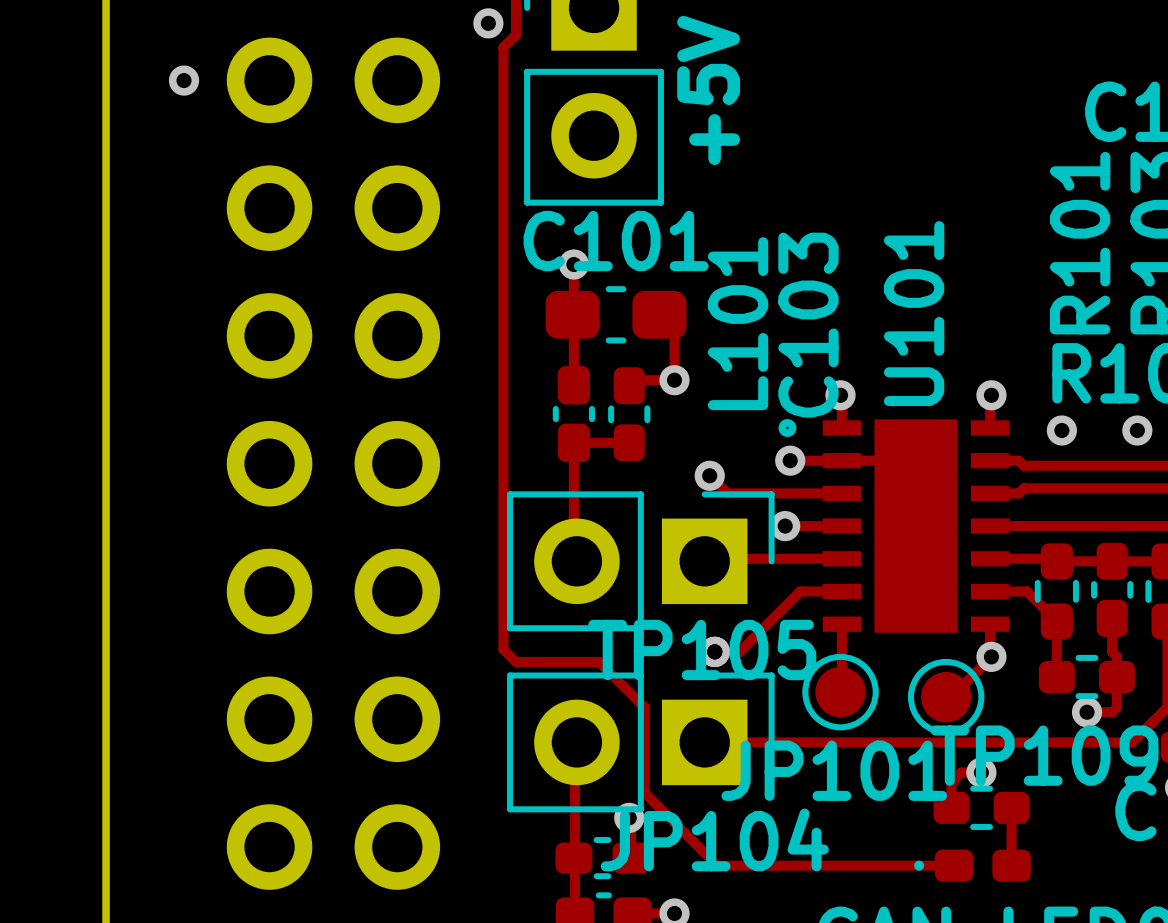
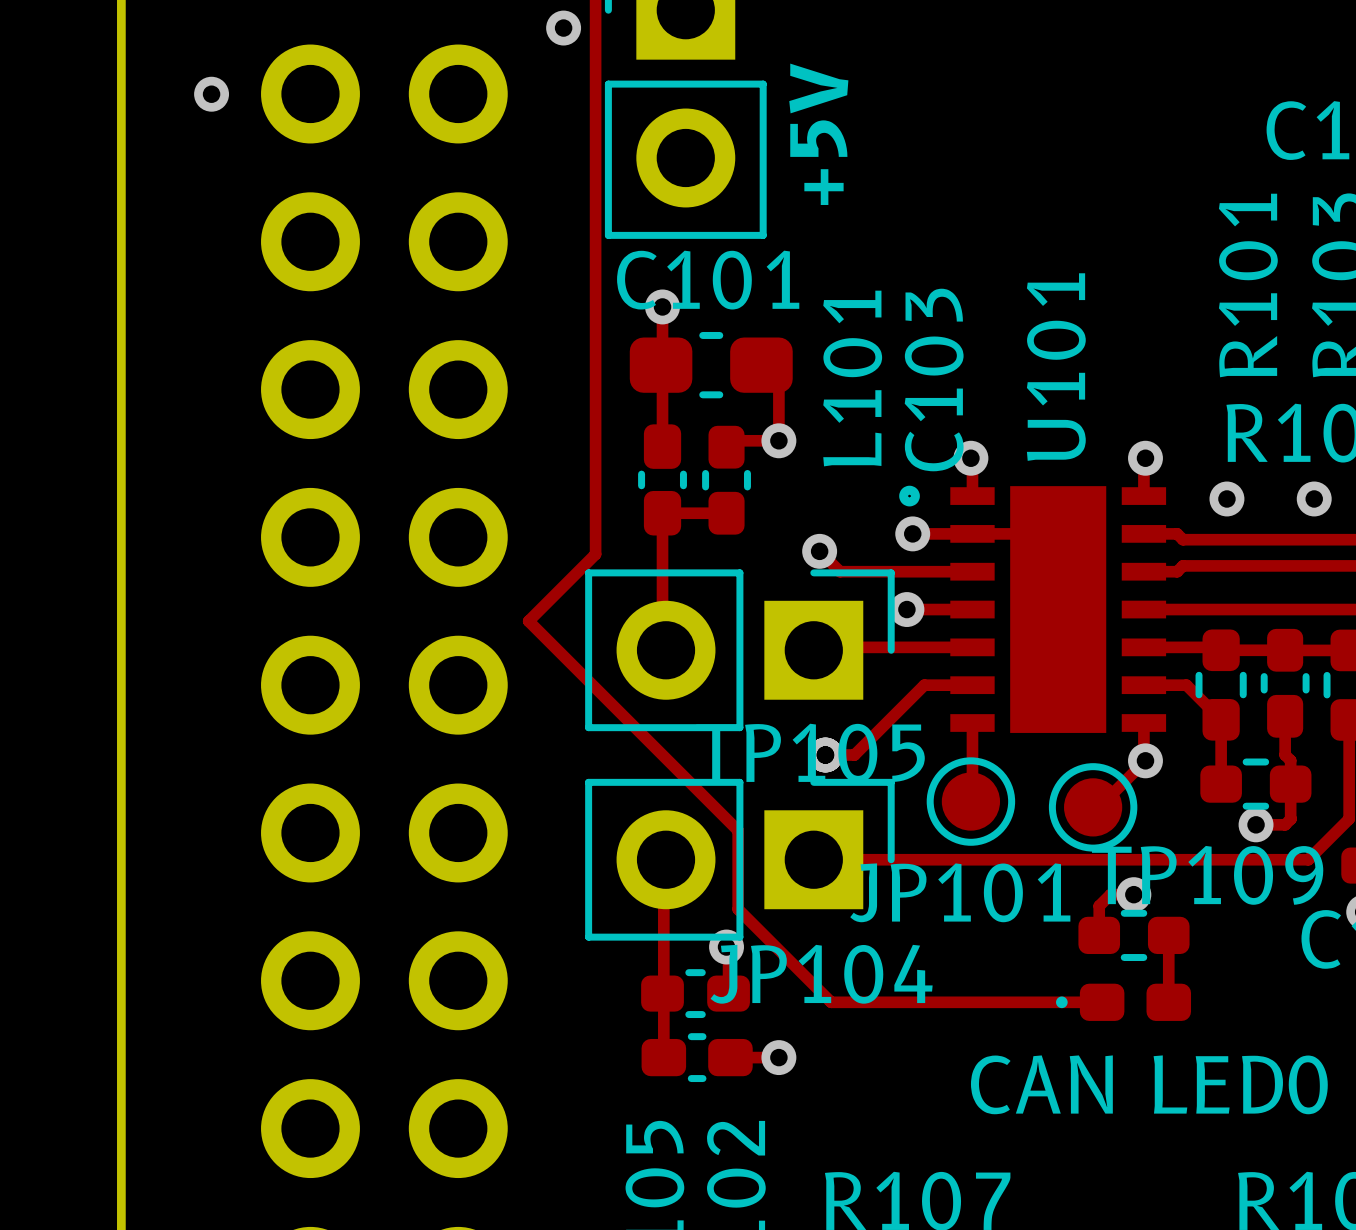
track: (516, 34) (503, 47) (503, 649) (515, 661) (599, 661) (644, 707) (644, 792) (717, 865) (719, 865) -> (595, 41) (595, 554) (528, 621) (738, 830) (738, 909) (831, 1002)

